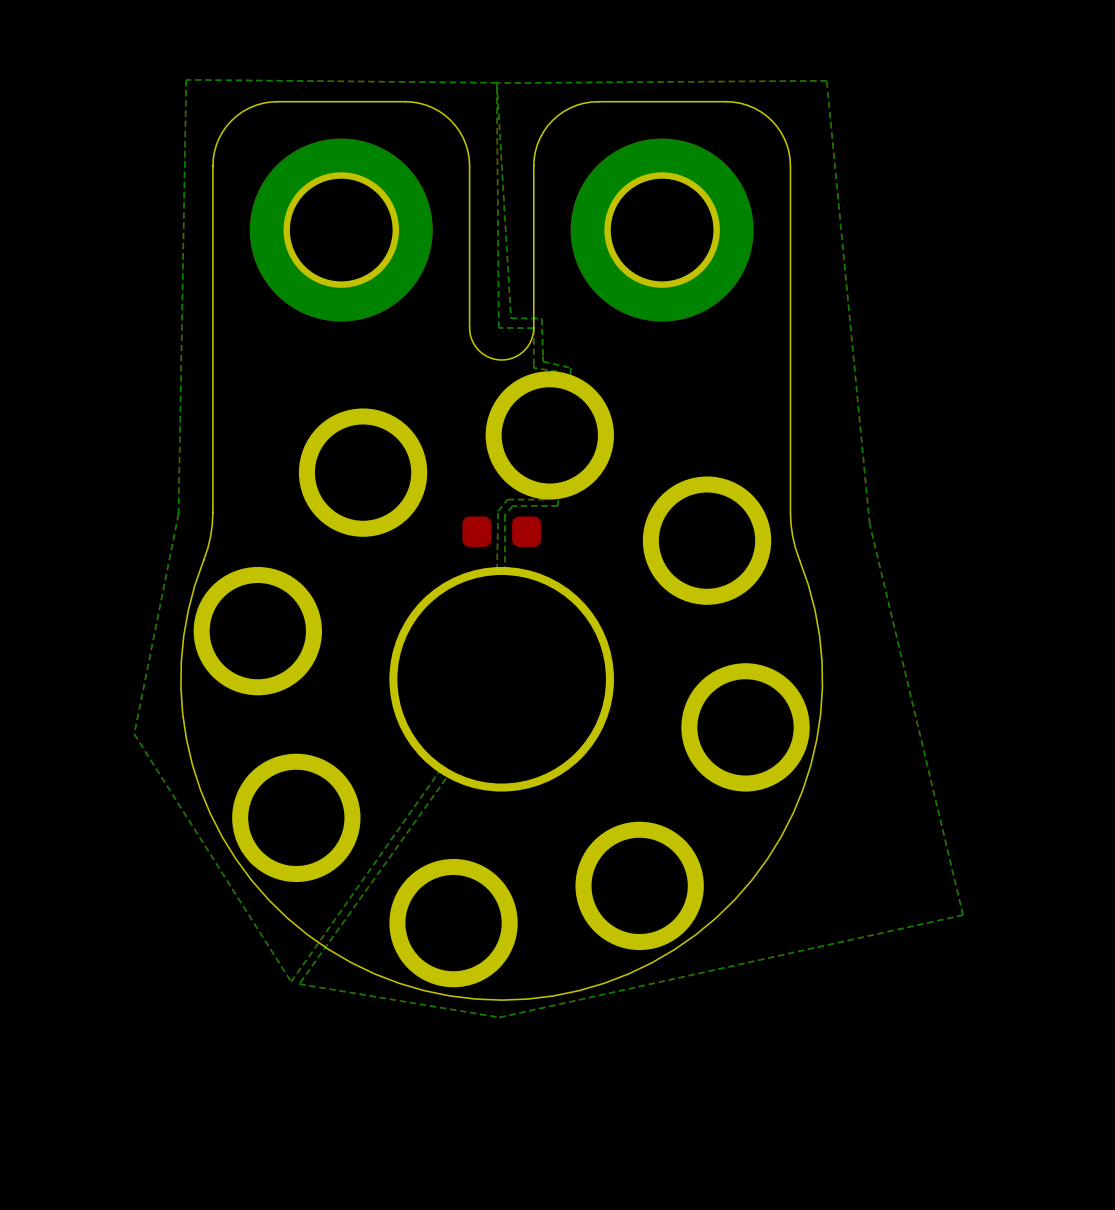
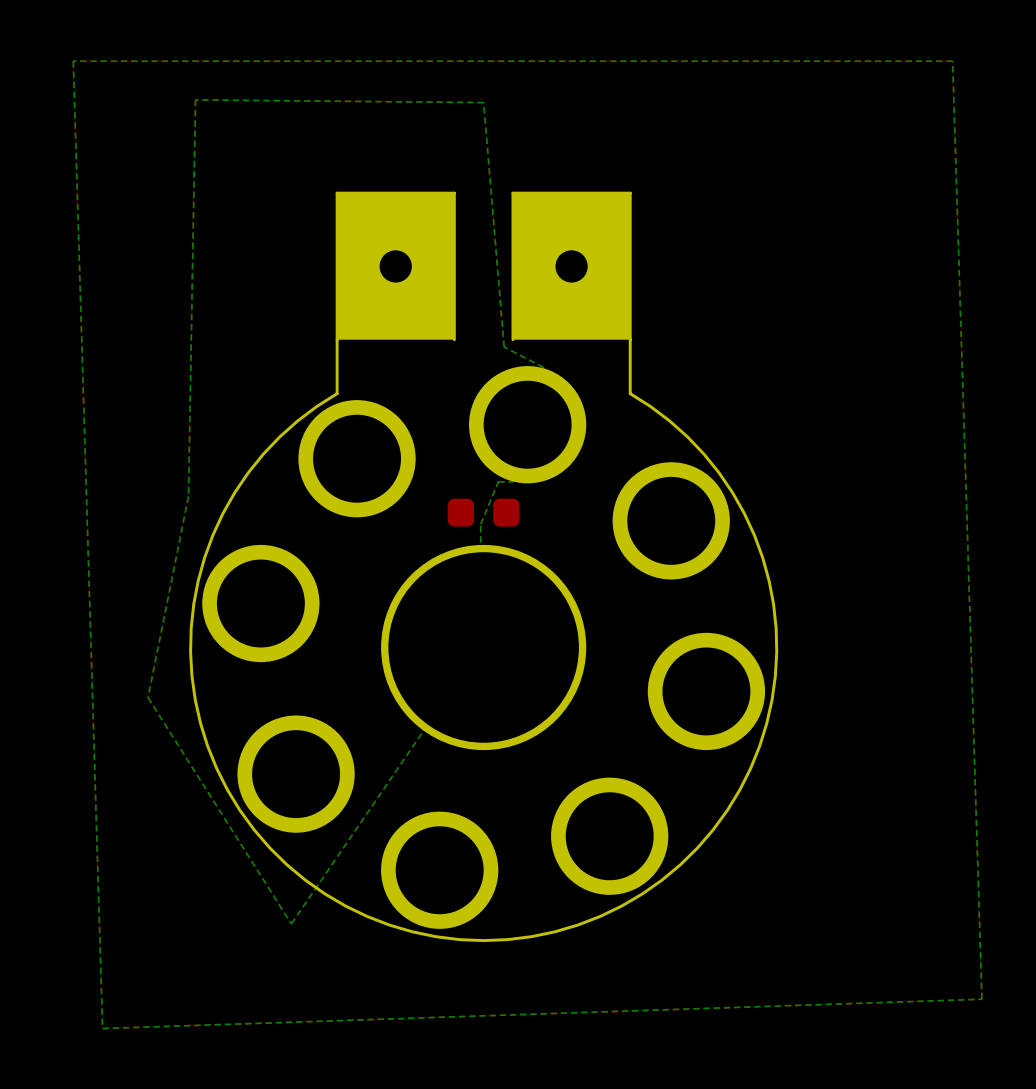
bottom zone outline: (186, 79) (496, 82) (498, 327) (533, 328) (533, 368) (557, 371) (548, 499) (507, 499) (498, 511) (494, 692) (291, 981) -> (195, 99) (483, 102) (504, 347) (543, 367) (512, 481) (498, 481) (480, 524) (480, 593) (415, 617) (444, 699) (291, 923)
bottom zone outline: (826, 80) (869, 523) (963, 915) (499, 1017) (299, 984) (505, 695) (504, 515) (512, 505) (557, 505) (570, 368) (543, 361) (541, 318) (510, 318) (496, 83) (826, 80) -> (952, 61) (981, 999) (102, 1028) (73, 61) (952, 61)
board edge: (726, 101) (590, 102) (576, 105) (563, 111) (547, 125) (540, 138) (534, 158) (533, 331) (530, 342) (522, 351) (505, 359) (494, 359) (483, 354) (475, 346) (470, 335) (469, 158) (463, 138) (455, 125) (445, 115) (426, 105) (412, 102) (269, 102) (249, 108) (237, 115) (226, 125) (216, 144) (212, 165) (212, 524) (207, 548) (188, 609) (183, 635) (180, 687) (186, 739) (200, 789) (210, 813) (236, 859) (251, 880) (268, 899) (307, 934) (351, 962) (374, 973) (424, 990) (449, 995) (501, 1000) (527, 999) (579, 990) (628, 973) (674, 949) (716, 918) (734, 899) (751, 880) (781, 837) (802, 789) (816, 739) (820, 713) (822, 661) (814, 609) (795, 548) (791, 524) (790, 158) (784, 138) (776, 125) (766, 115) (747, 105) (726, 101) -> none
part: (341, 230) -> none
part: (662, 230) -> none
part: none -> (395, 266)
part: none -> (571, 266)
board edge: none -> (630, 339) (630, 393) (669, 420) (687, 436) (719, 472) (744, 513) (762, 557) (773, 604) (776, 652) (772, 699) (766, 723) (750, 768) (727, 810) (697, 847) (662, 880) (621, 905) (577, 925) (531, 936) (483, 940) (435, 936) (389, 925) (345, 905) (305, 880) (269, 847) (239, 810) (216, 768) (200, 723) (195, 699) (190, 652) (193, 604) (204, 557) (222, 513) (248, 472) (263, 454) (297, 420) (337, 393) (337, 339)

